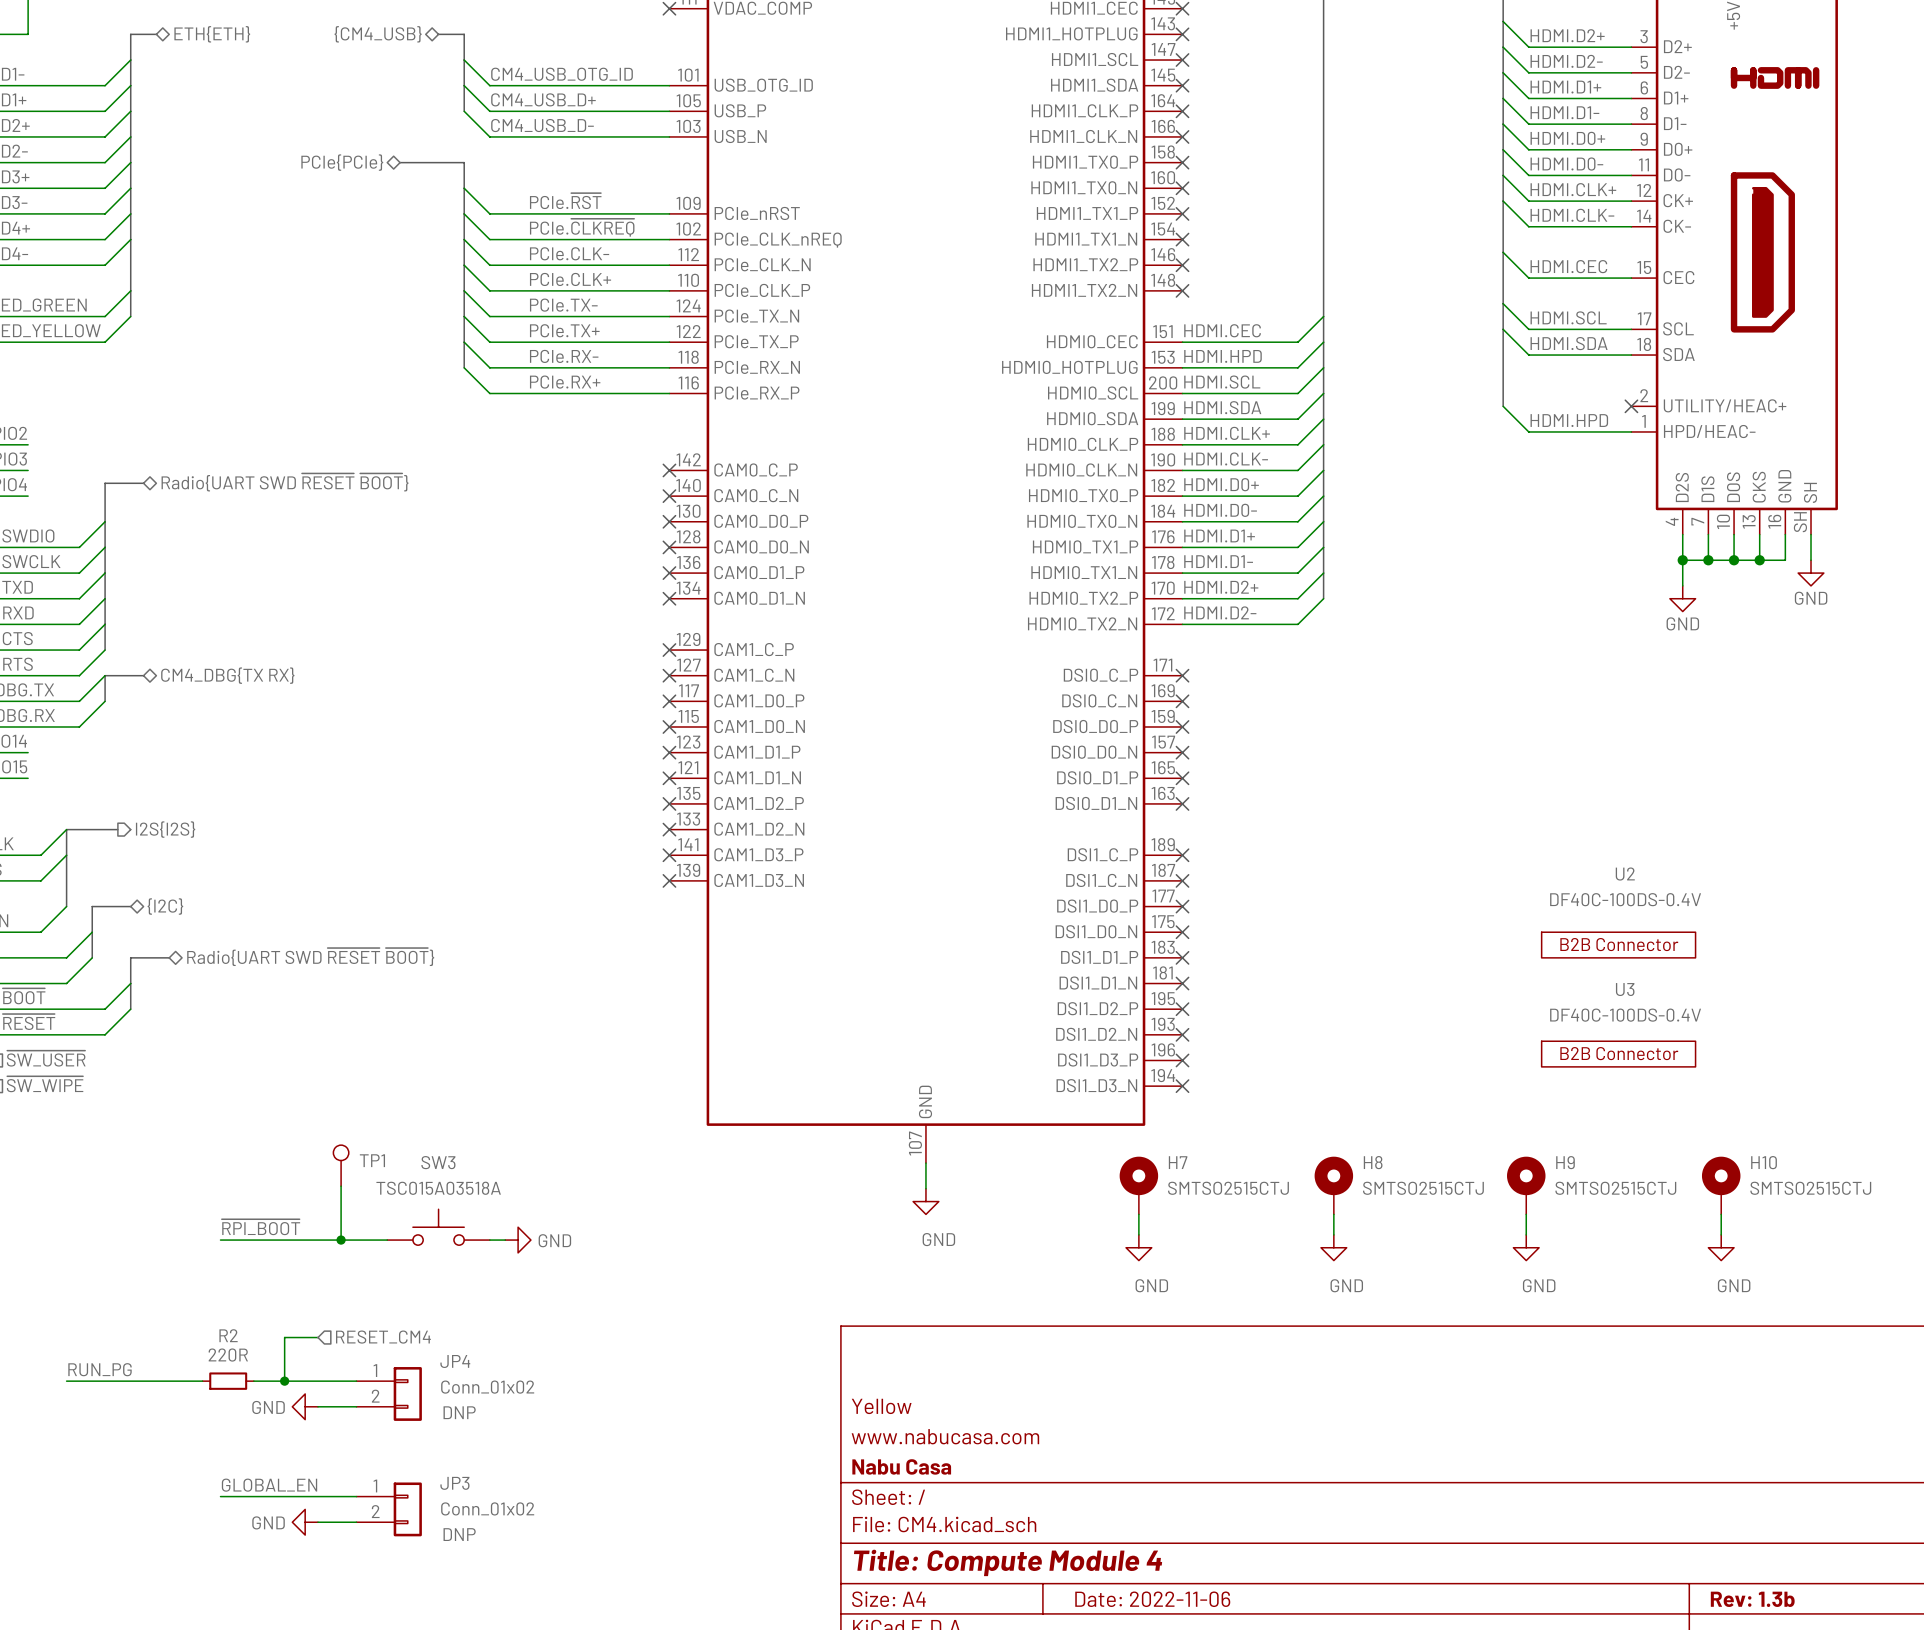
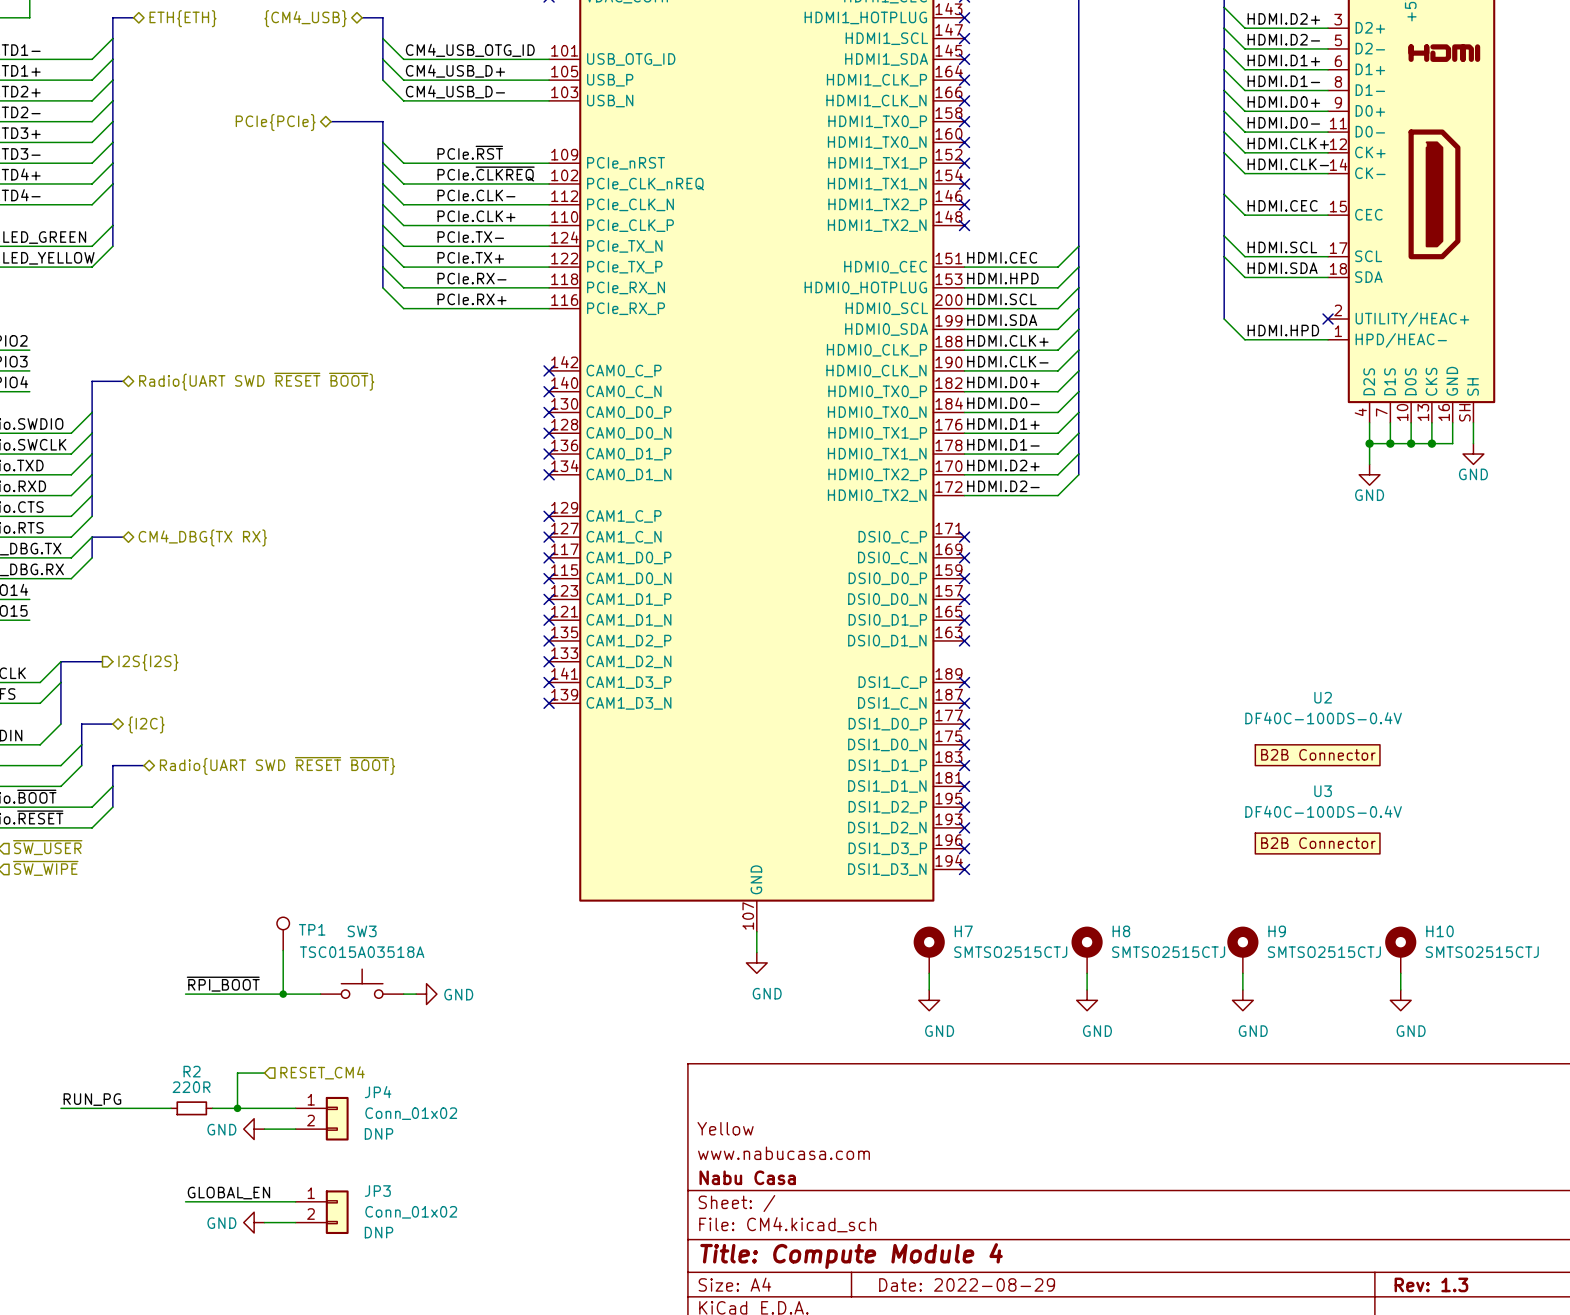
title block: Date: 2022-11-06 (1152, 1599) -> Date: 2022-08-29 (967, 1284)
title block: Rev: 1.3b (1752, 1599) -> Rev: 1.3 (1431, 1284)

